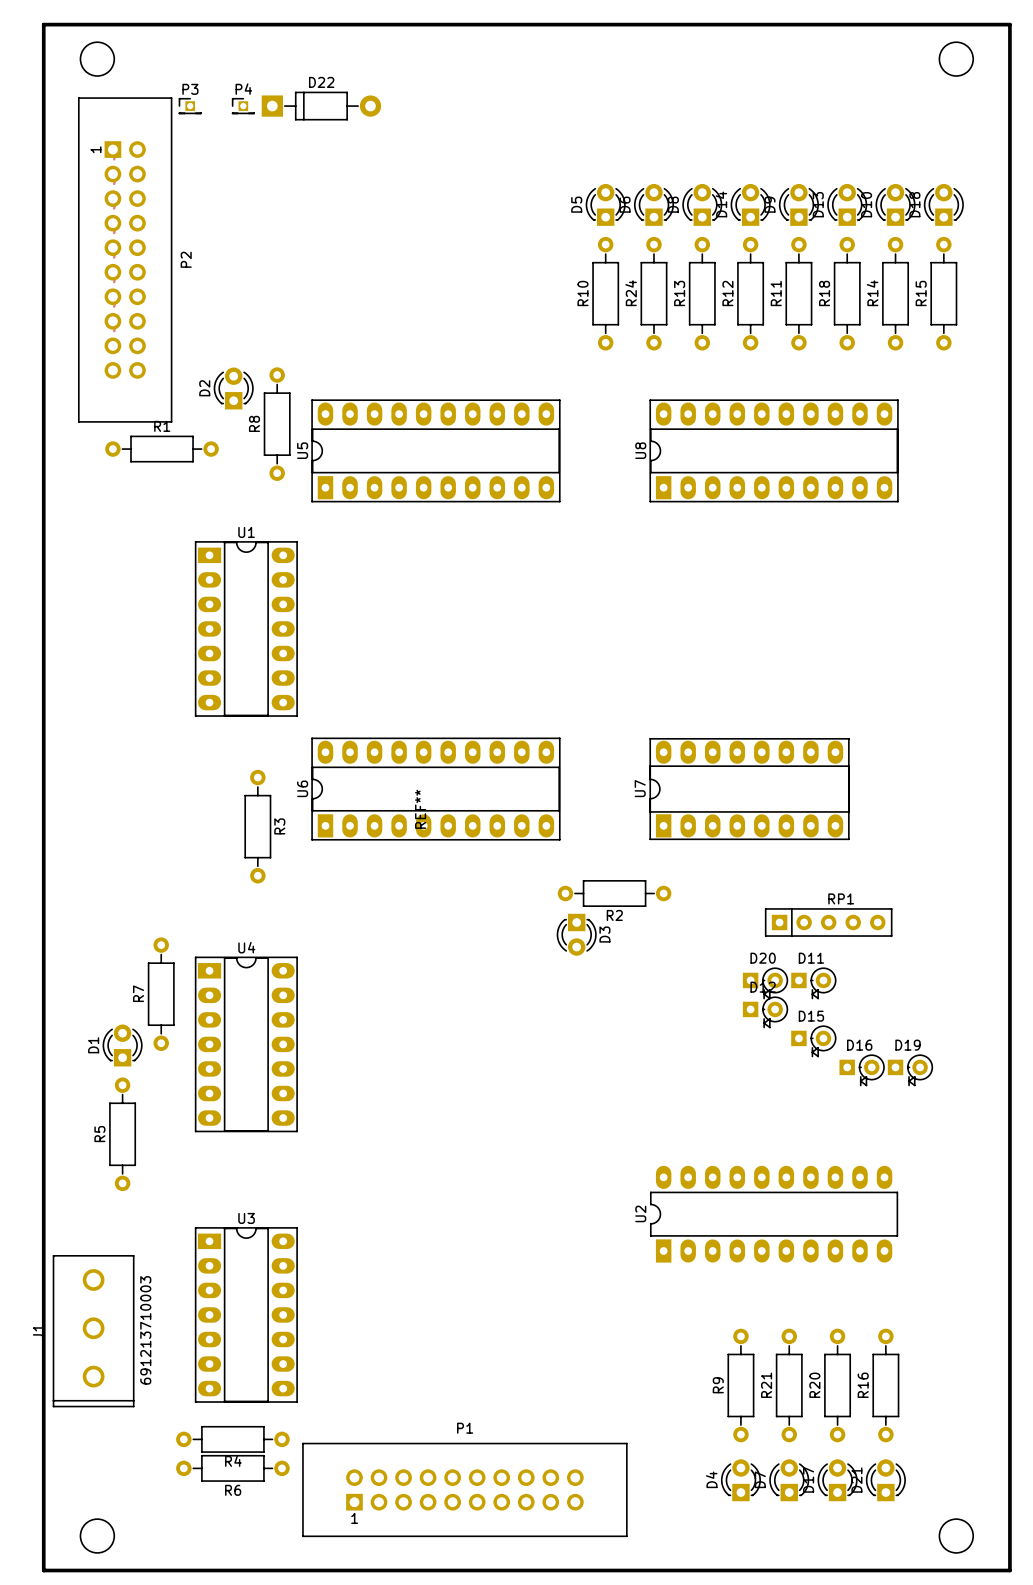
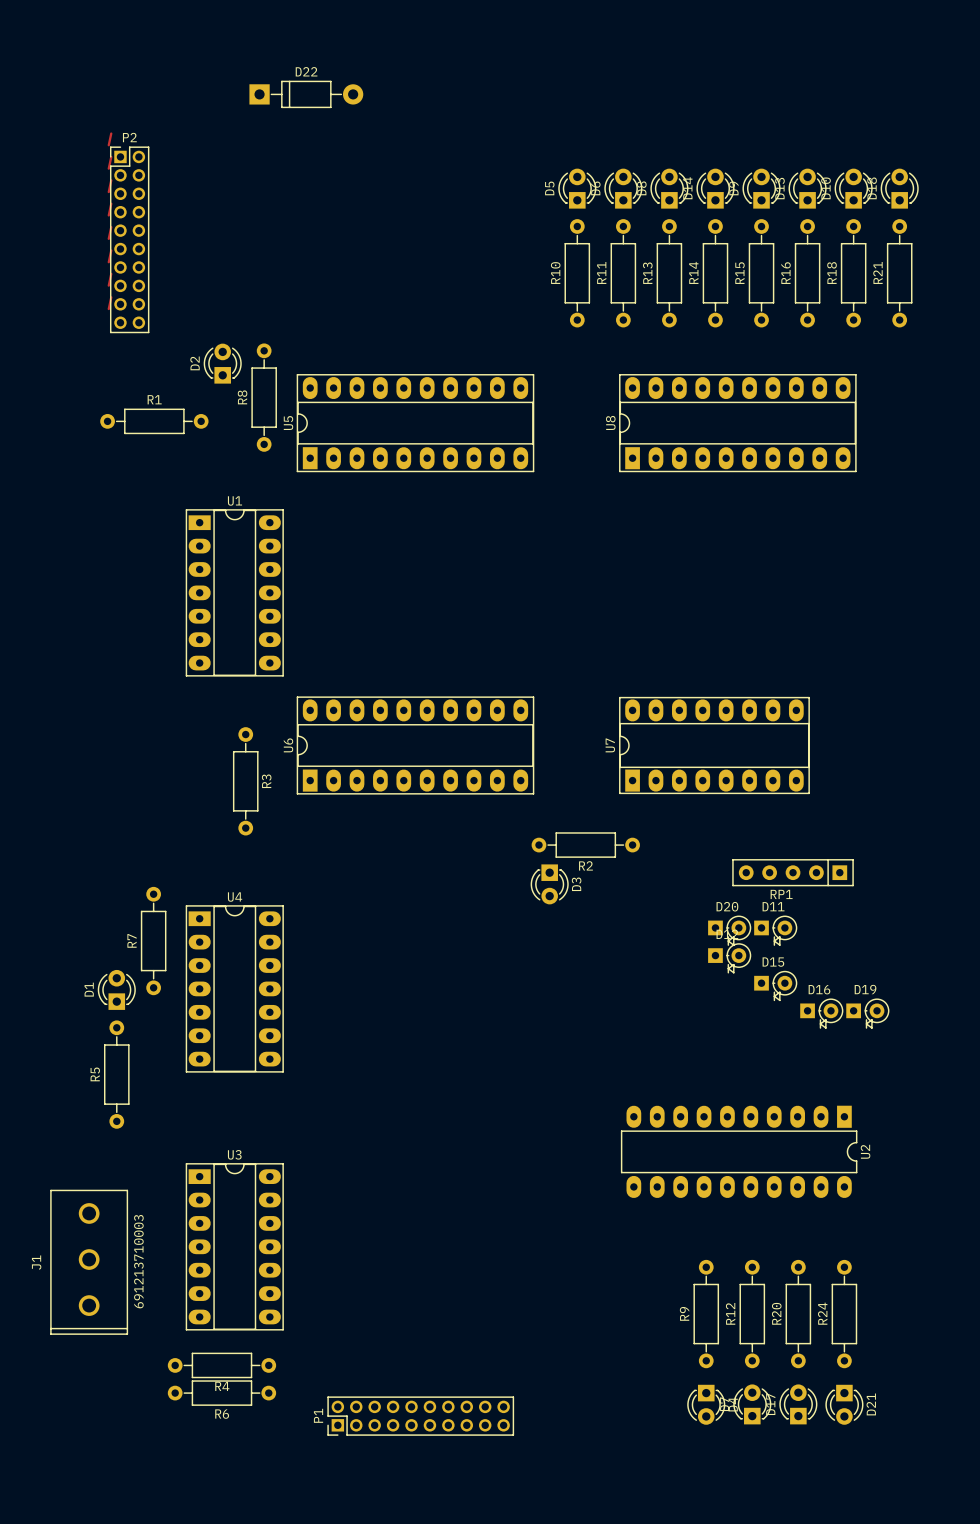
P2 footprint: [78, 97, 173, 423] -> [110, 146, 150, 334]
P3: (190, 106) -> none
P4: (243, 106) -> none
P2 name position: P2 (186, 259) -> P2 (129, 137)
R24 name: R24 (631, 293) -> R11 (601, 272)
R12 name: R12 (727, 293) -> R14 (693, 272)
R11 name: R11 (776, 293) -> R15 (739, 273)
R18 name: R18 (824, 293) -> R16 (786, 273)
R14 name: R14 (872, 293) -> R18 (832, 273)
R15 name: R15 (921, 293) -> R21 (877, 272)
REF**: (526, 797) -> none
RP1 rotation: 0° (828, 922) -> 180° (793, 872)
U2 rotation: 0° (774, 1214) -> 180° (739, 1151)
R21 name: R21 (766, 1385) -> R12 (730, 1313)
R16 name: R16 (863, 1385) -> R24 (822, 1313)
P1 name position: P1 (465, 1428) -> P1 (318, 1415)
P1 footprint: [302, 1442, 628, 1537] -> [327, 1396, 514, 1436]
D4 rotation: 0° (740, 1480) -> 180° (706, 1404)
D21 rotation: 0° (885, 1480) -> 180° (844, 1404)

